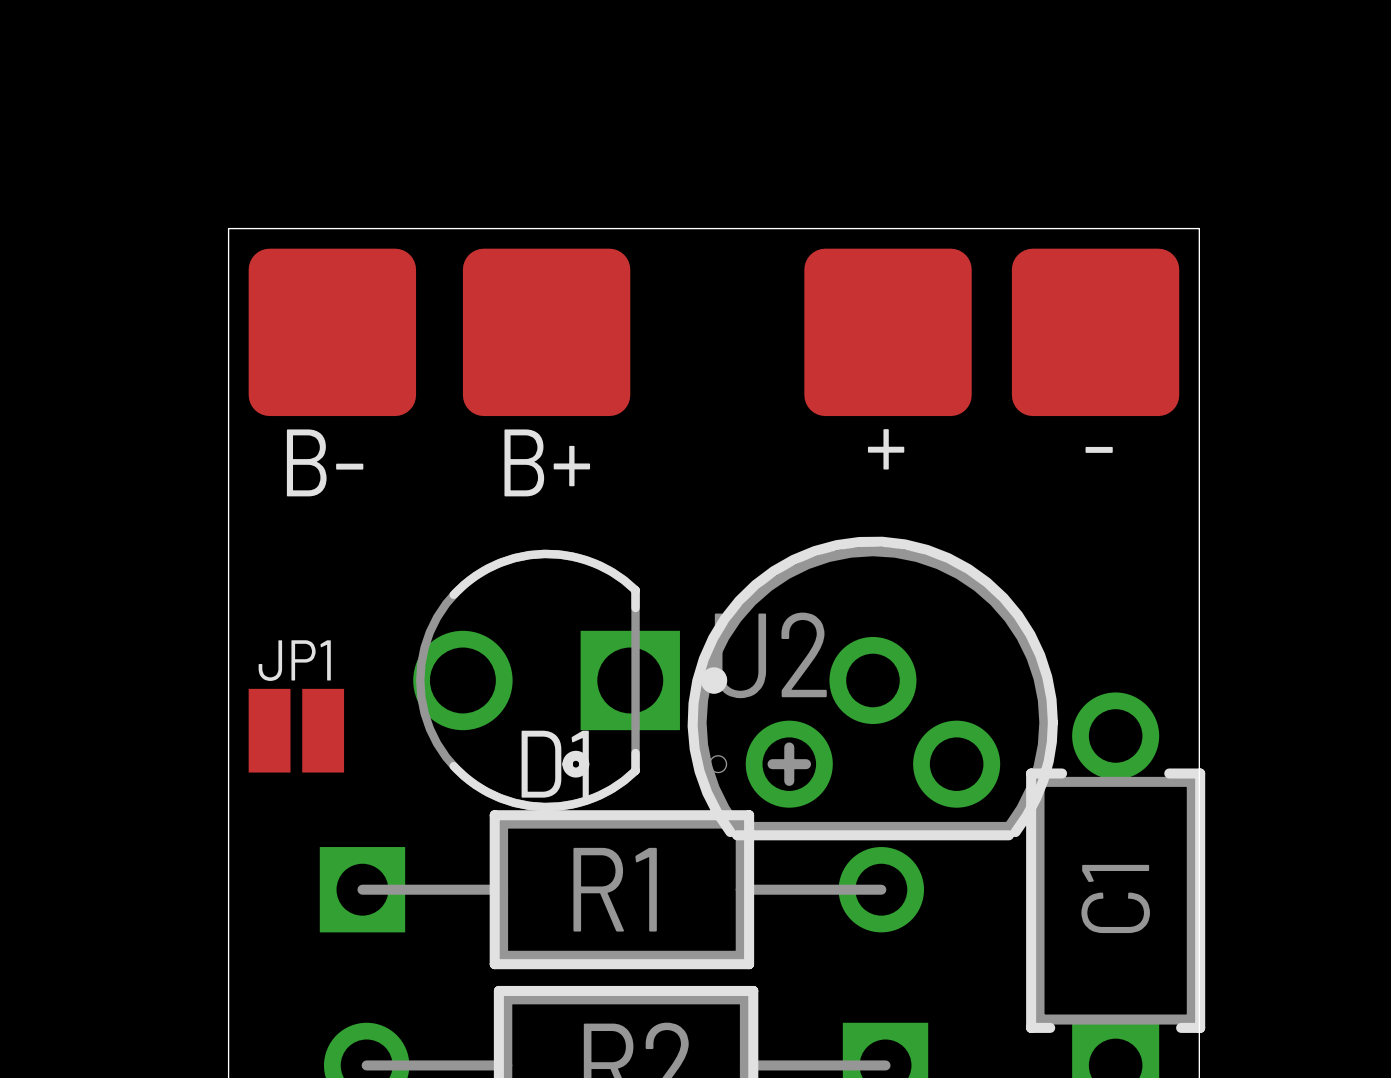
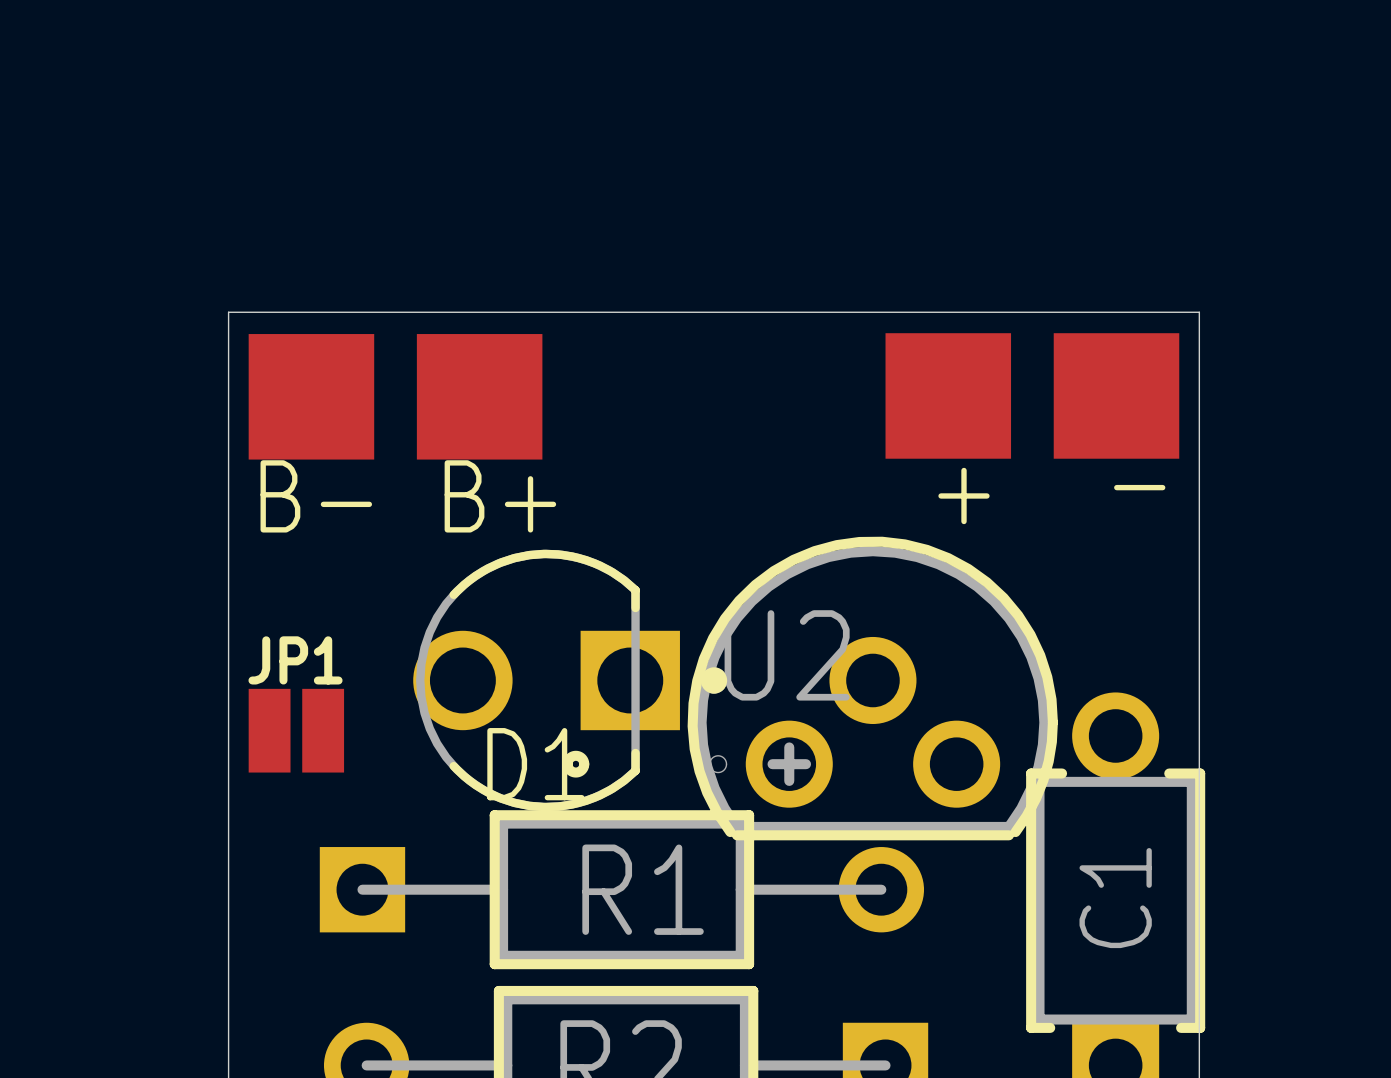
board edge: (228, 312) (228, 228) (1199, 228) (1199, 312) -> (228, 312) (1199, 312)
part: (332, 332) -> none
part: (546, 332) -> none
part: (888, 332) -> none
part: (1095, 332) -> none
part: none -> (948, 395)
part: none -> (1116, 395)
part: none -> (311, 396)
part: none -> (479, 396)
text position: + (886, 449) -> + (964, 495)
text position: - (1099, 449) -> - (1139, 487)
text position: B- (325, 462) -> B- (316, 496)
text position: B+ (547, 462) -> B+ (500, 496)

